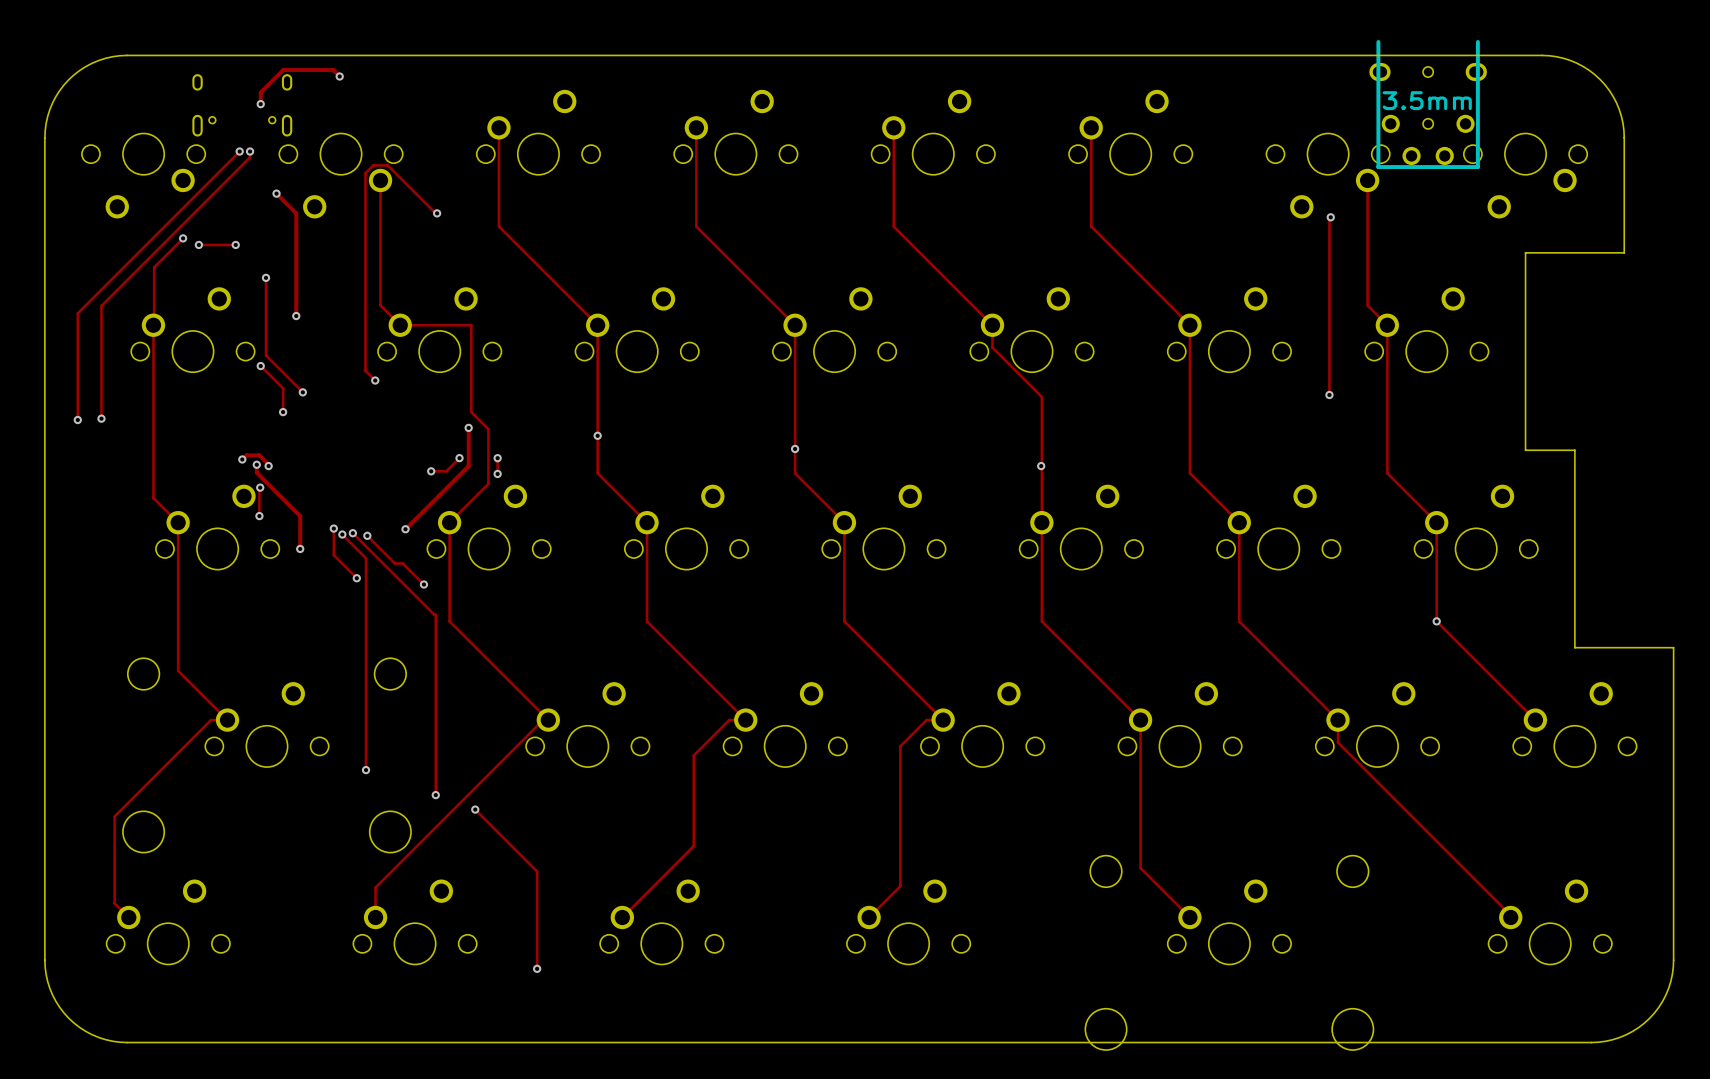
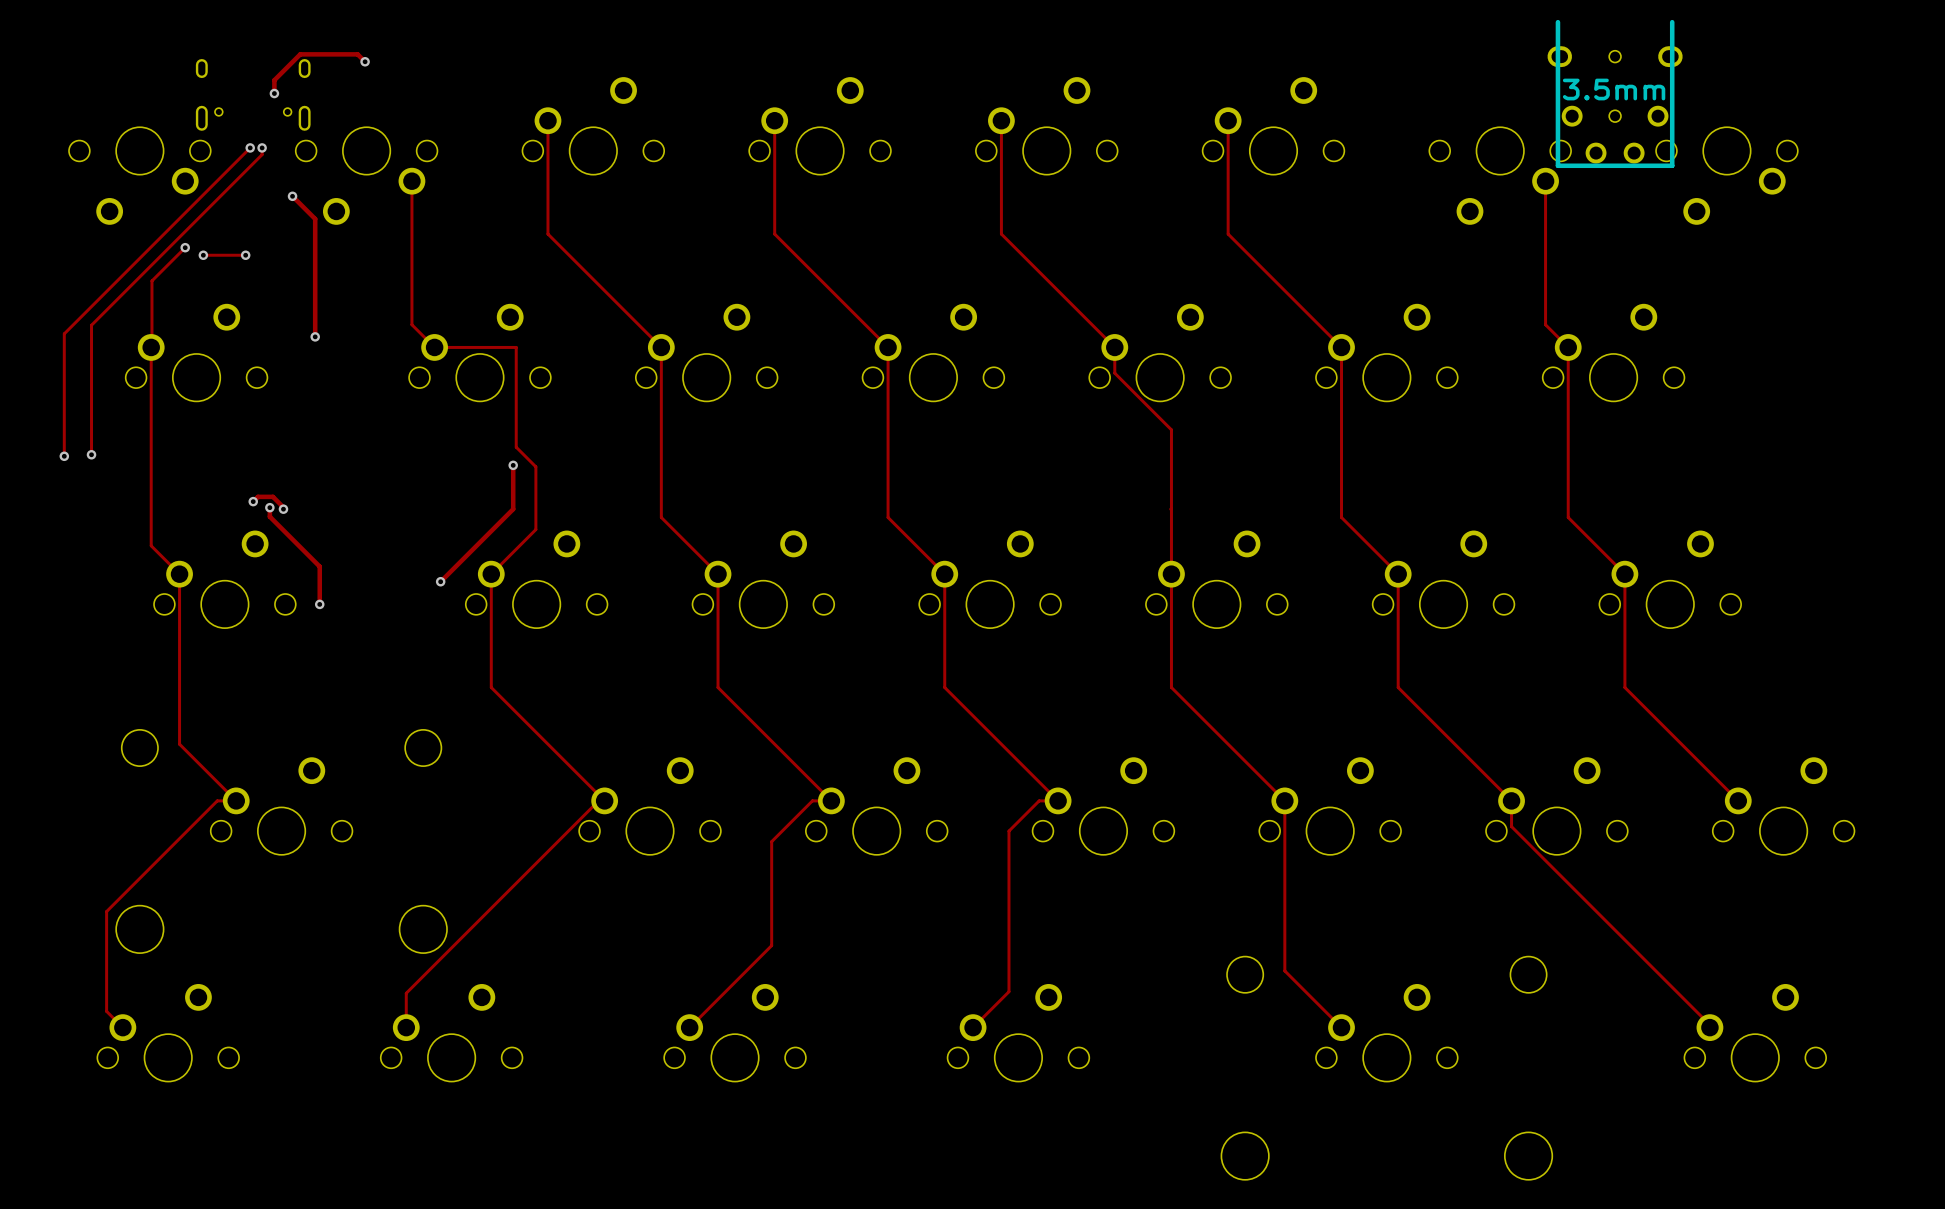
board edge: (127, 55) (1541, 55) (1563, 58) (1583, 66) (1594, 74) (1609, 90) (1616, 102) (1623, 123) (1624, 252) (1525, 252) (1525, 450) (1574, 450) (1574, 647) (1673, 647) (1673, 960) (1670, 981) (1662, 1001) (1649, 1018) (1632, 1031) (1612, 1039) (1591, 1042) (127, 1042) (105, 1039) (86, 1031) (68, 1018) (59, 1007) (49, 988) (45, 967) (44, 137) (46, 123) (52, 102) (68, 79) (92, 63) (112, 56) (127, 55) -> none
via: (437, 213) -> none
track: (437, 214) (387, 165) (373, 165) (365, 173) (365, 370) (375, 380) -> none
track: (1330, 217) (1329, 395) -> none
via: (1330, 217) -> none
track: (266, 277) (266, 355) (302, 392) -> none
via: (266, 277) -> none
track: (260, 366) (283, 388) (283, 412) -> none
via: (260, 366) -> none
via: (375, 380) -> none
via: (302, 392) -> none
via: (1329, 395) -> none
via: (283, 412) -> none
via: (597, 435) -> none
via: (795, 448) -> none
track: (459, 458) (446, 471) (431, 471) -> none
via: (459, 458) -> none
track: (497, 458) (497, 473) -> none
via: (497, 458) -> none
via: (1041, 466) -> none
via: (431, 471) -> none
via: (497, 473) -> none
track: (260, 487) (259, 516) -> none
via: (260, 487) -> none
via: (259, 516) -> none
track: (333, 528) (333, 555) (356, 578) -> none
via: (333, 528) -> none
track: (352, 533) (435, 614) (435, 795) -> none
via: (352, 533) -> none
track: (342, 534) (366, 558) (366, 770) -> none
via: (342, 534) -> none
track: (367, 535) (394, 563) (402, 563) (423, 584) -> none
via: (367, 535) -> none
via: (356, 578) -> none
via: (423, 584) -> none
via: (1436, 621) -> none
via: (366, 770) -> none
via: (435, 795) -> none
track: (475, 809) (537, 871) (537, 968) -> none
via: (475, 809) -> none
via: (537, 968) -> none

